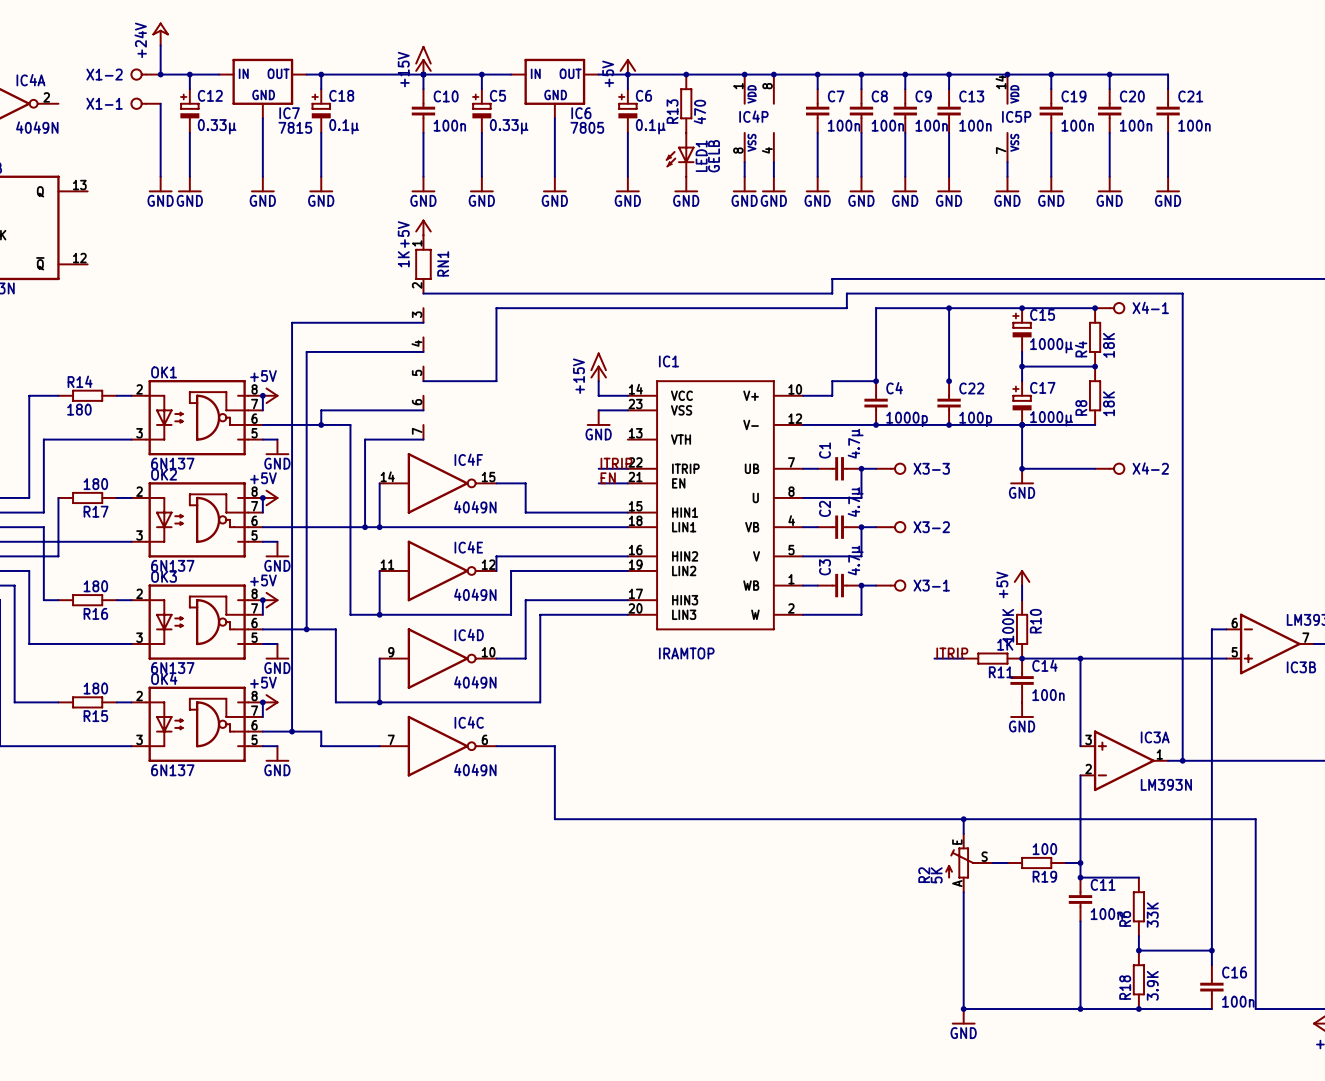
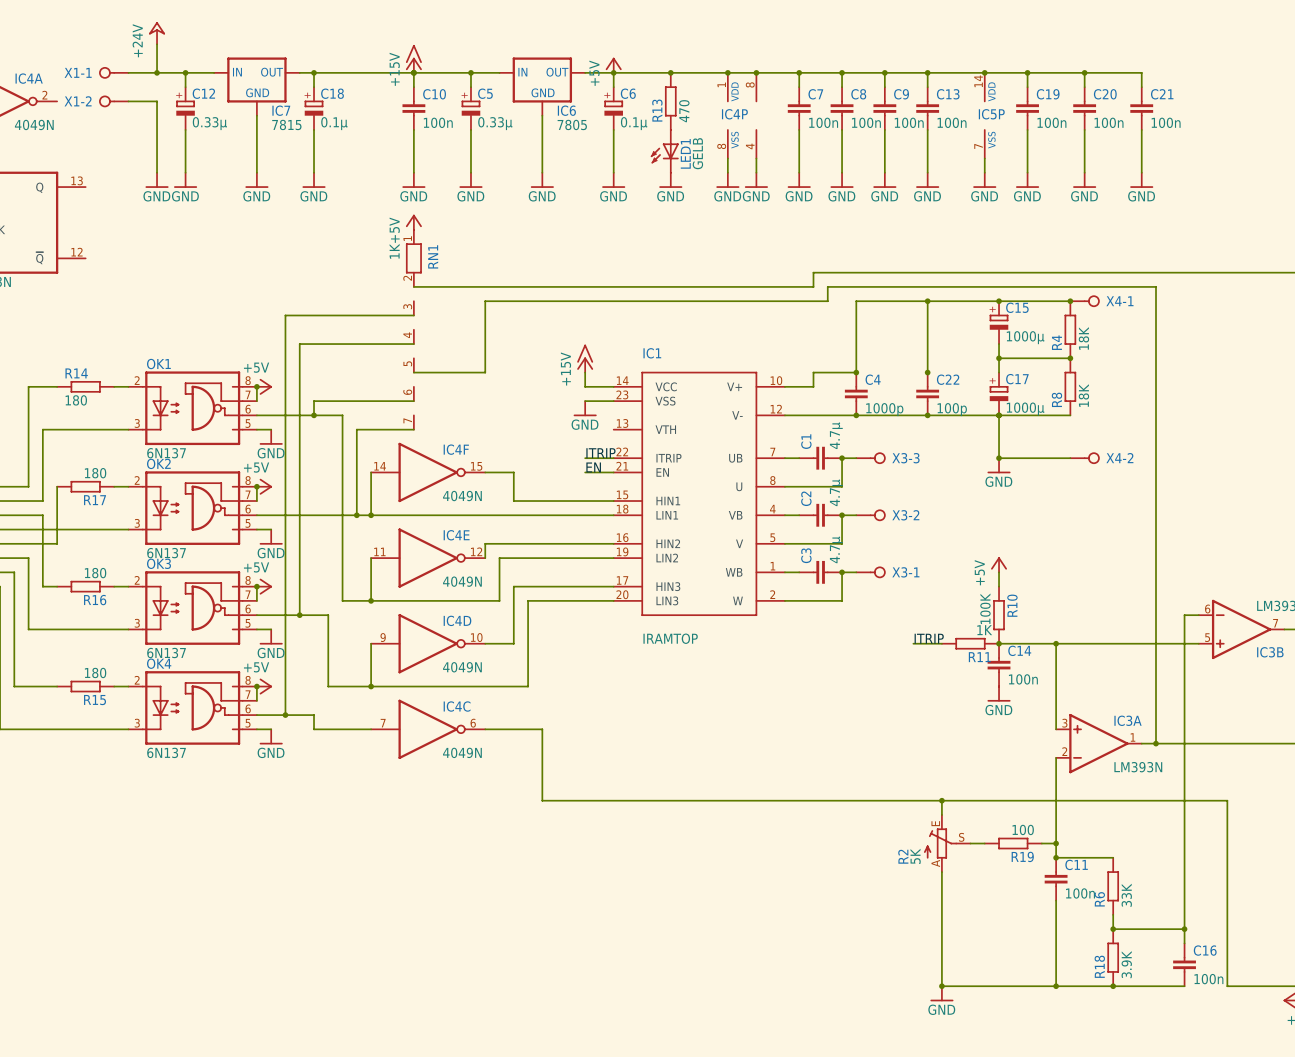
X1-2 position: (145, 74) -> (113, 101)
X1-1 position: (145, 103) -> (113, 72)

